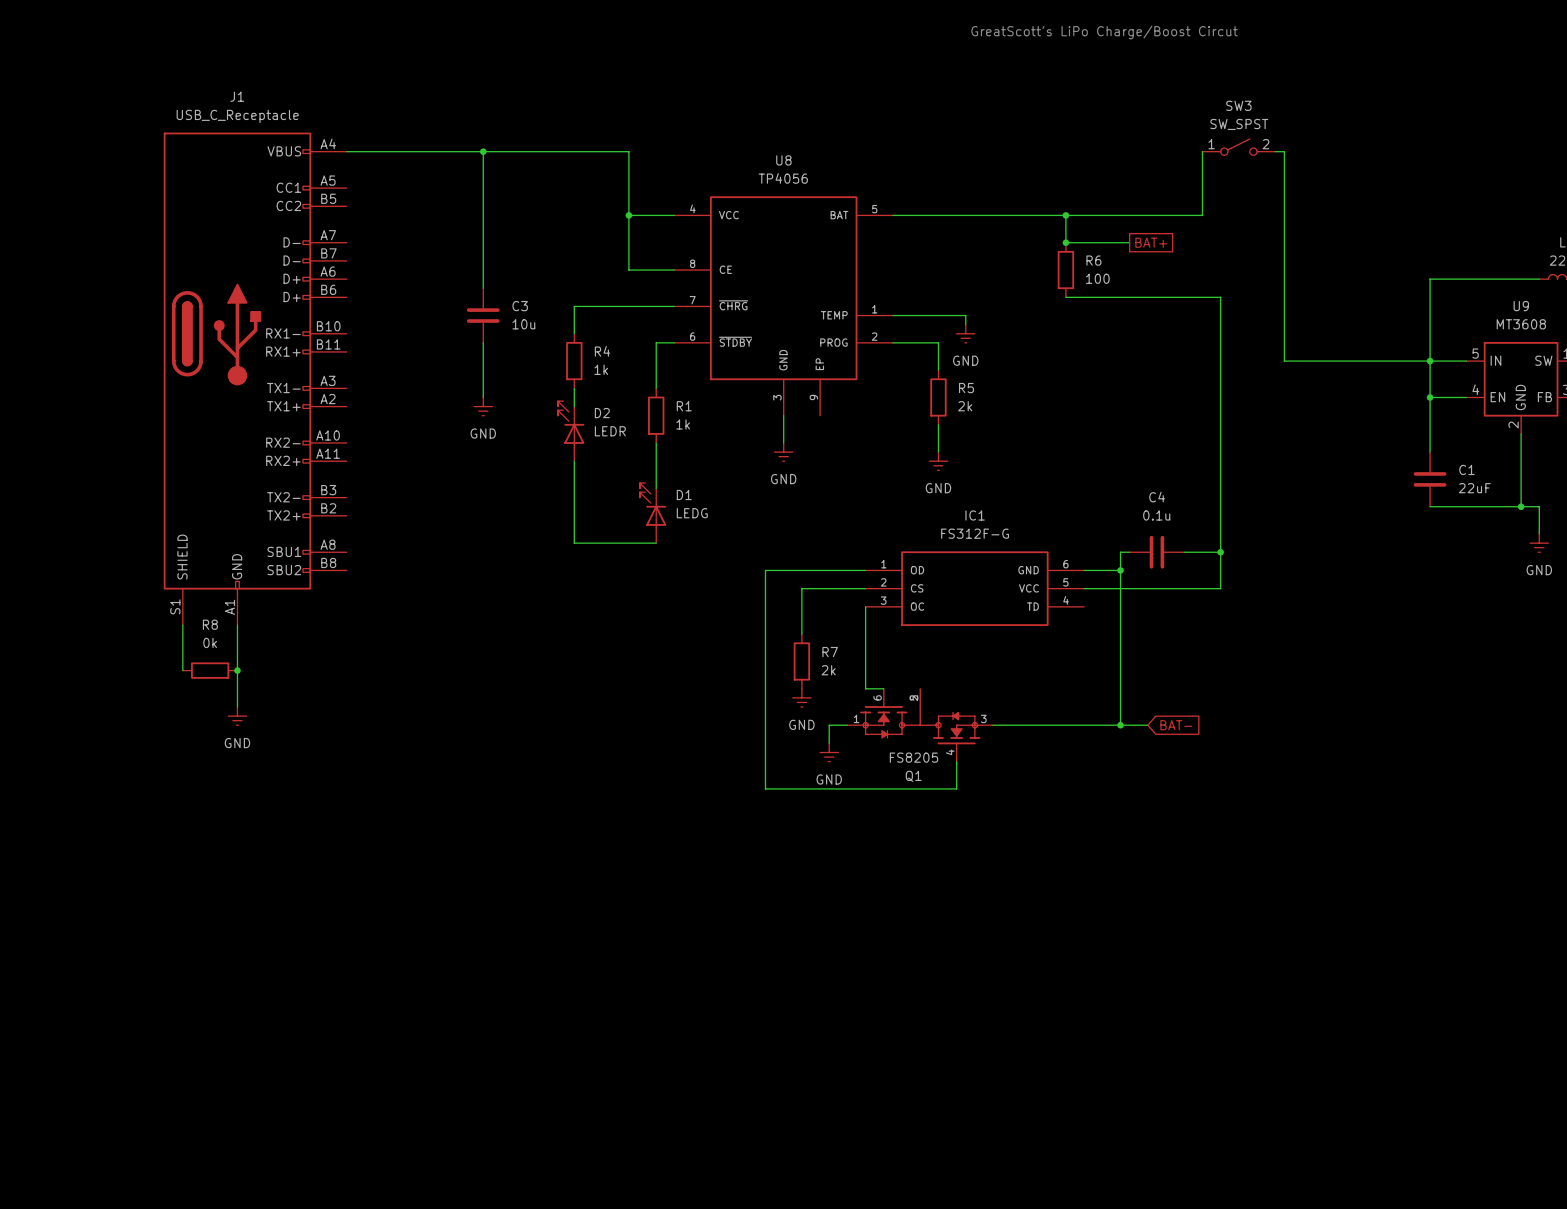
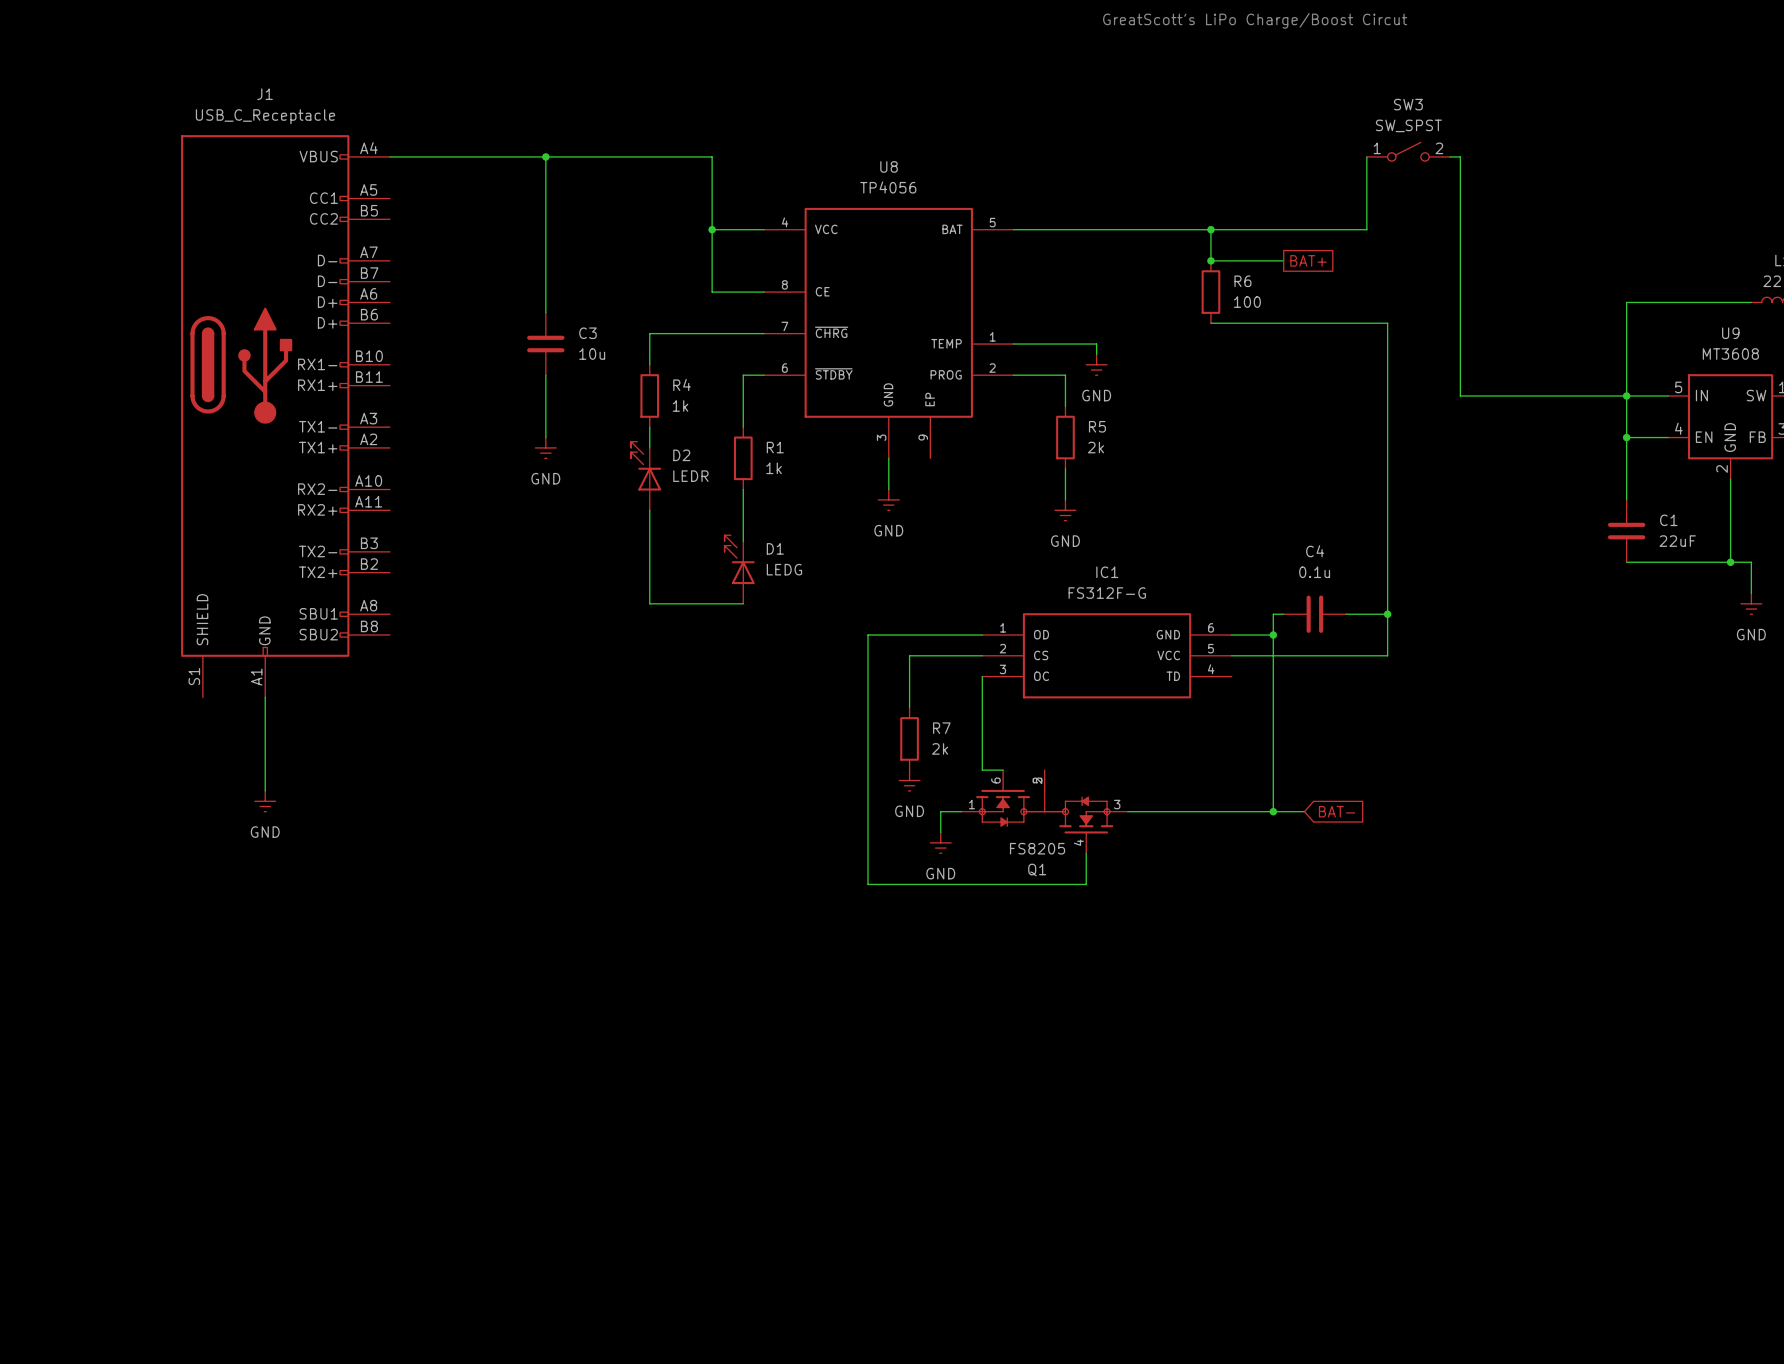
wire: (182, 625) (182, 670) -> none
R8: 0k (210, 670) -> none
junction: (237, 670) -> none

